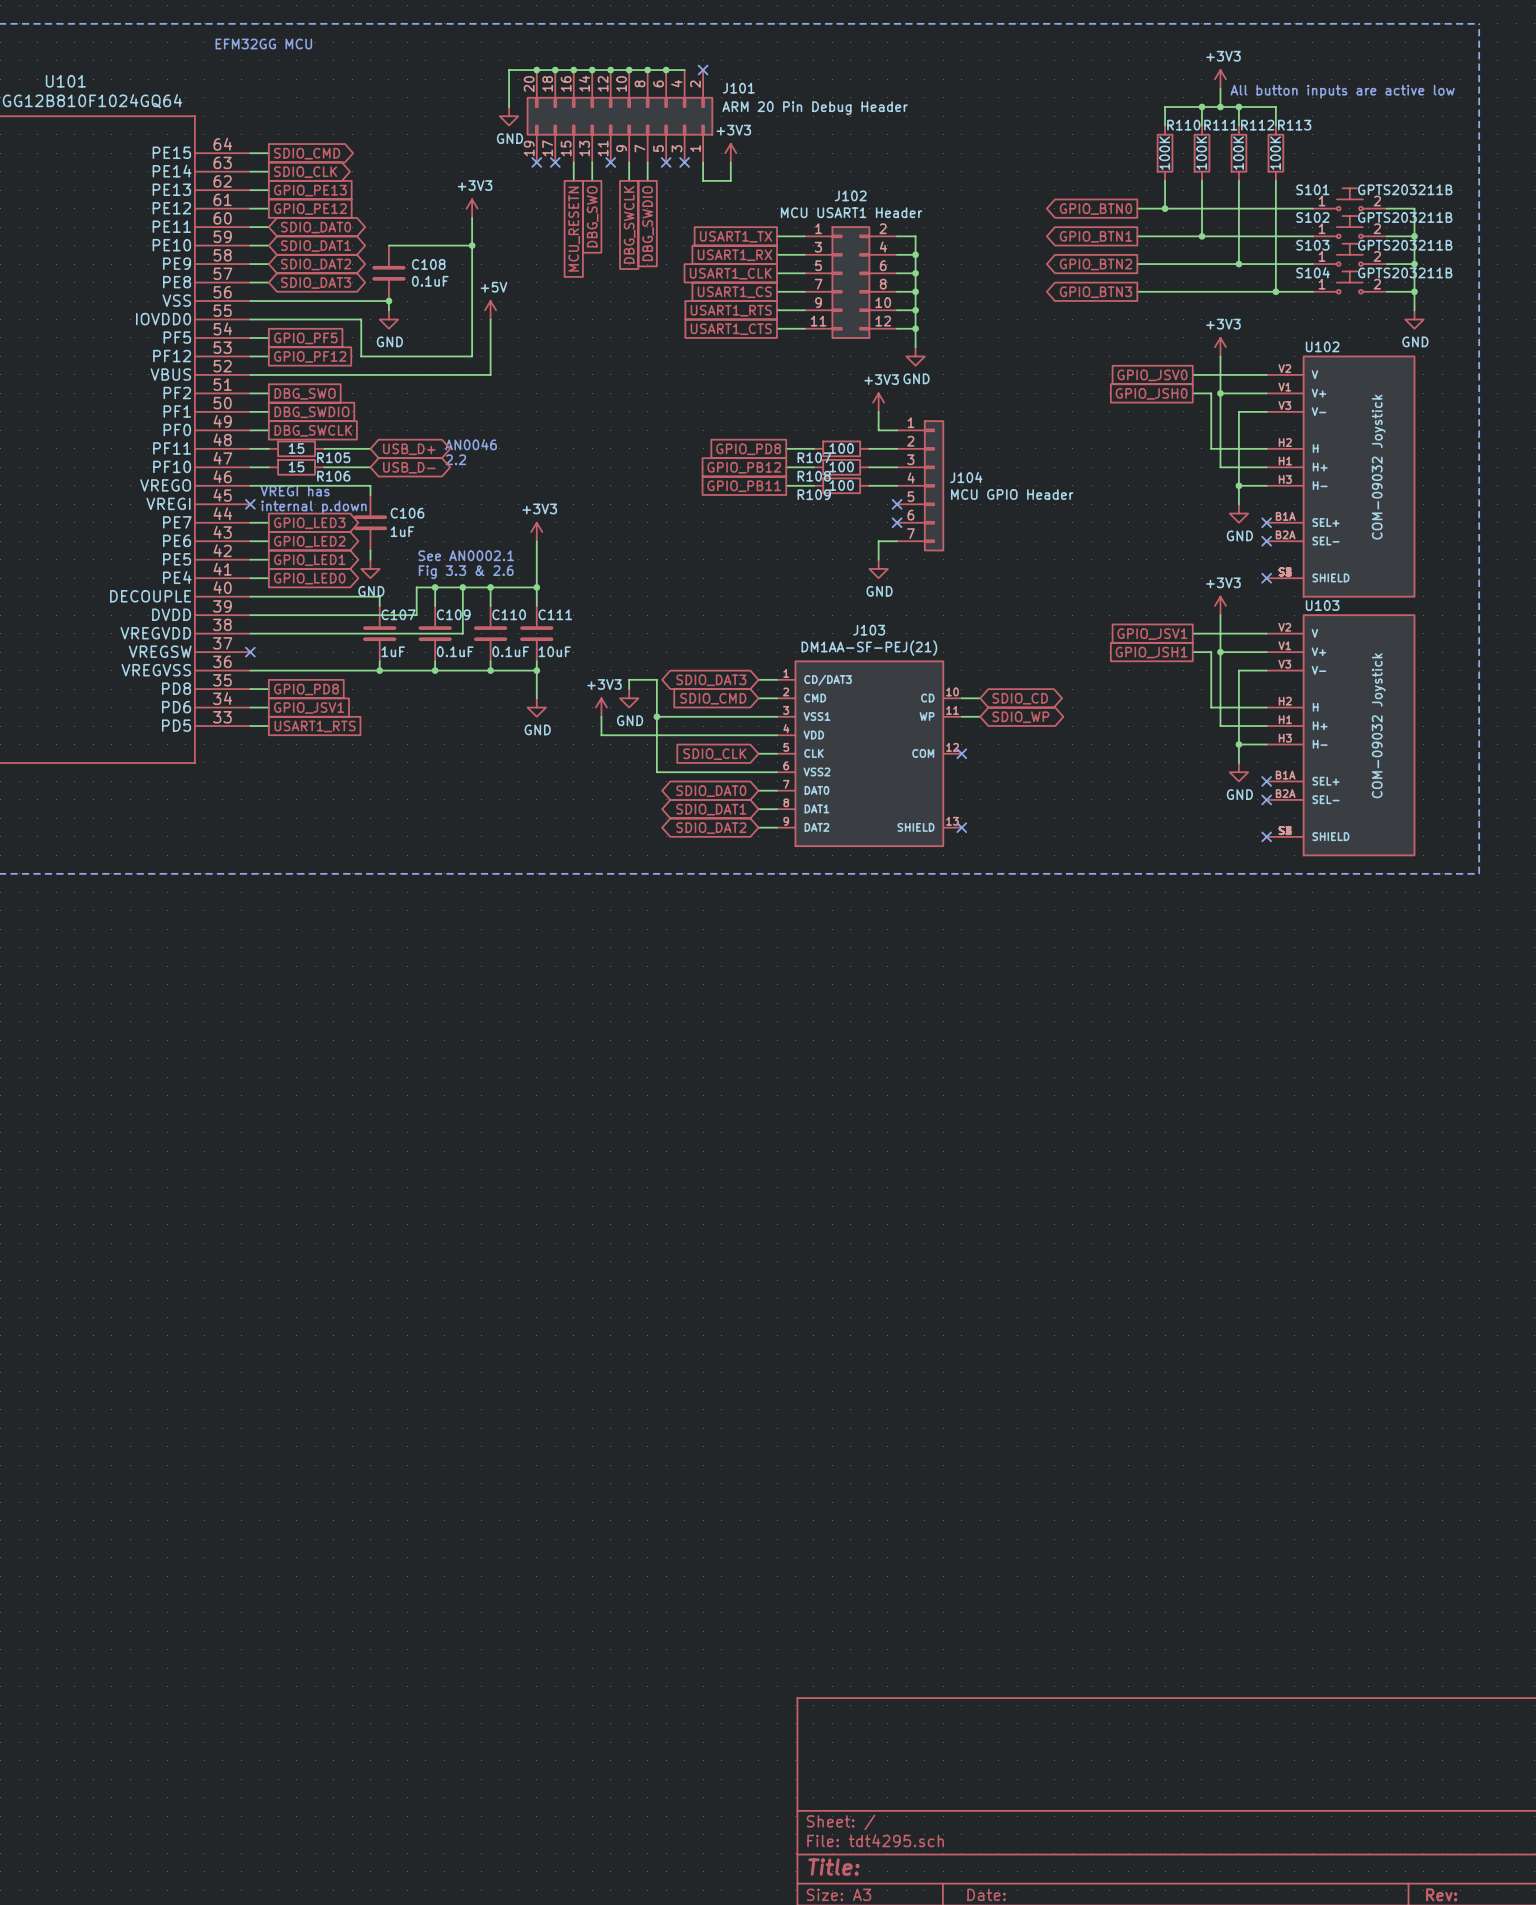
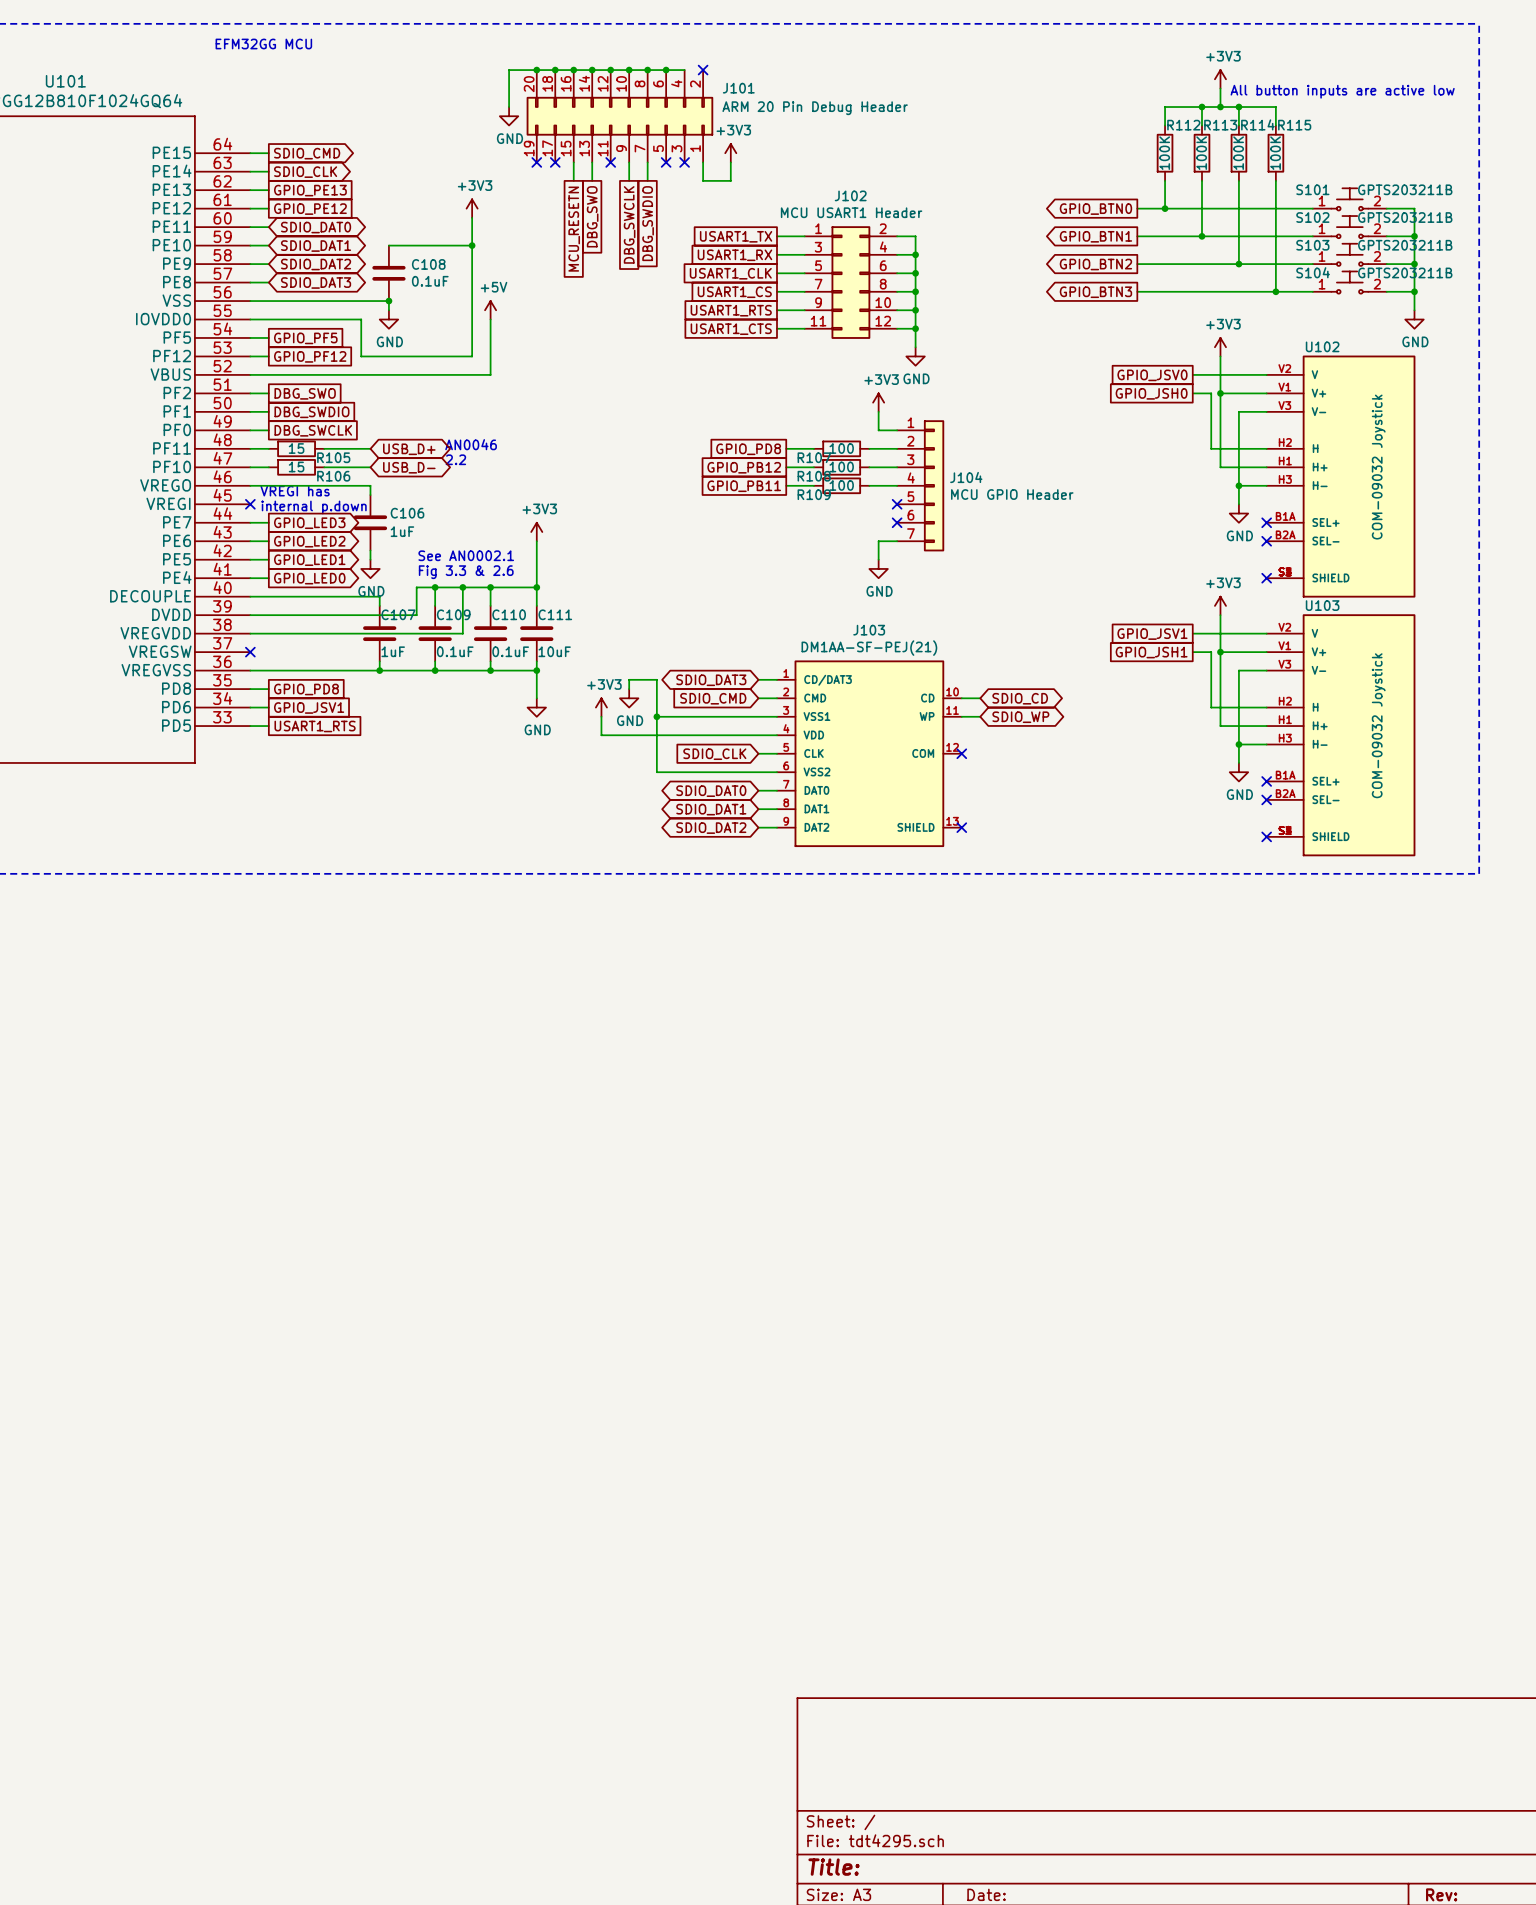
R110 name: R110 (1183, 125) -> R112 (1183, 125)
R111 name: R111 (1220, 125) -> R113 (1220, 125)
R112 name: R112 (1257, 125) -> R114 (1257, 124)
R113 name: R113 (1294, 125) -> R115 (1294, 125)

